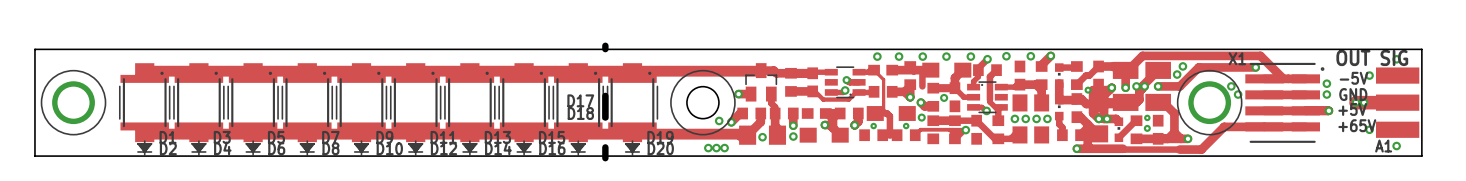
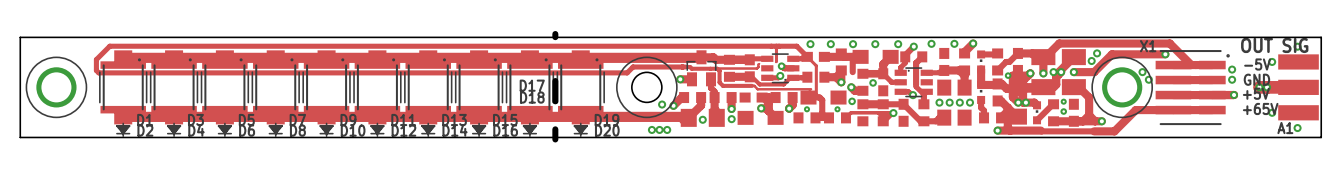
track: none -> (776, 49) (776, 46) (775, 62)
track: none -> (807, 56) (796, 46) (109, 46) (96, 59) (96, 70) (98, 72) (627, 72) (633, 67) (690, 67) (691, 68) (717, 68) (719, 70) (719, 82) (722, 85) (754, 85) (757, 89) (811, 89) (808, 91)
track: none -> (759, 63) (756, 68) (710, 68)

